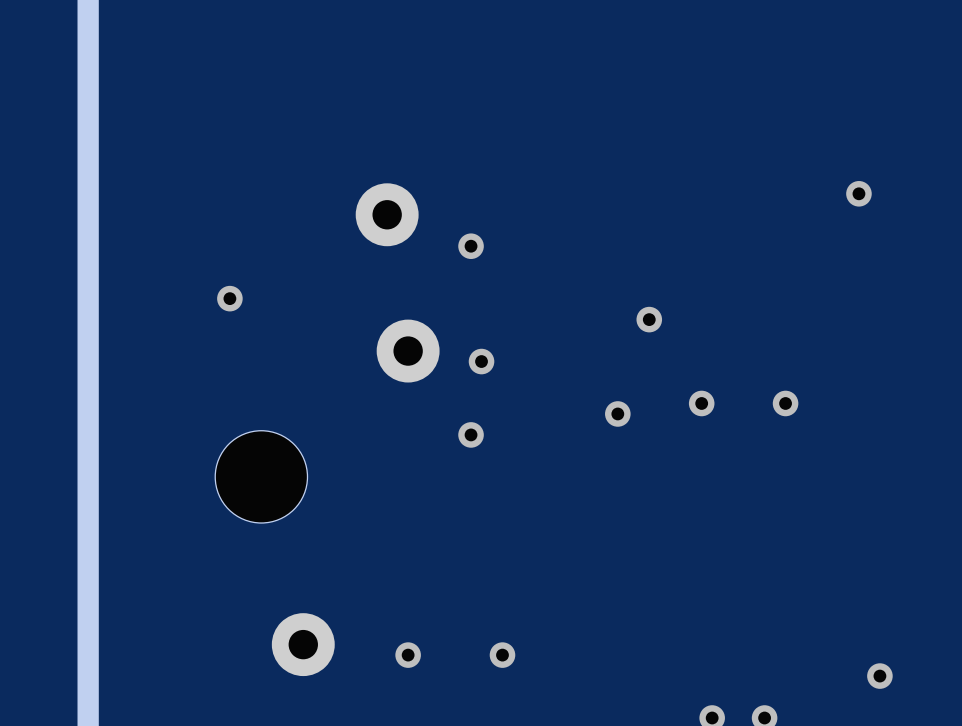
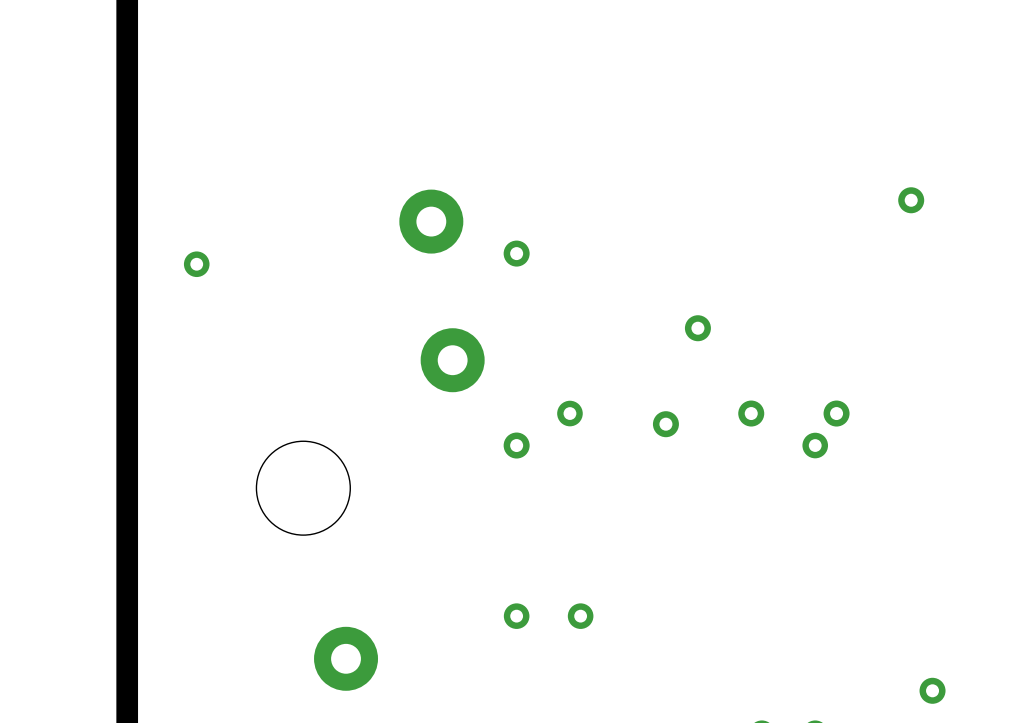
via position: (229, 298) -> (196, 264)
via position: (481, 361) -> (569, 413)
via: none -> (815, 445)
via: none -> (516, 616)
via: none -> (580, 616)
via: (408, 655) -> none
via: (502, 655) -> none

